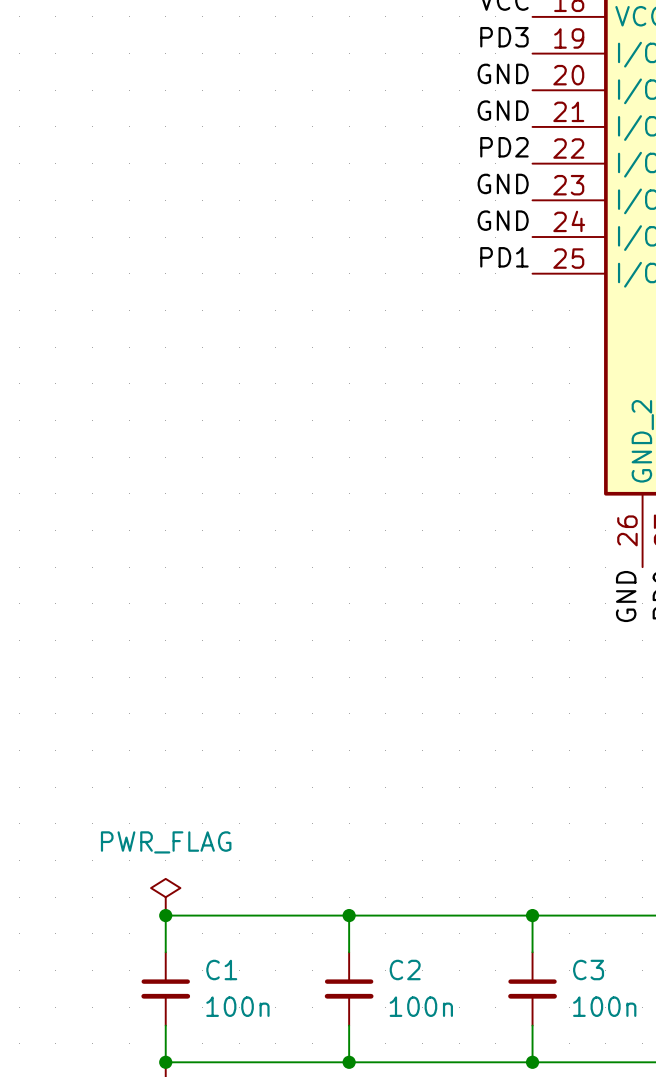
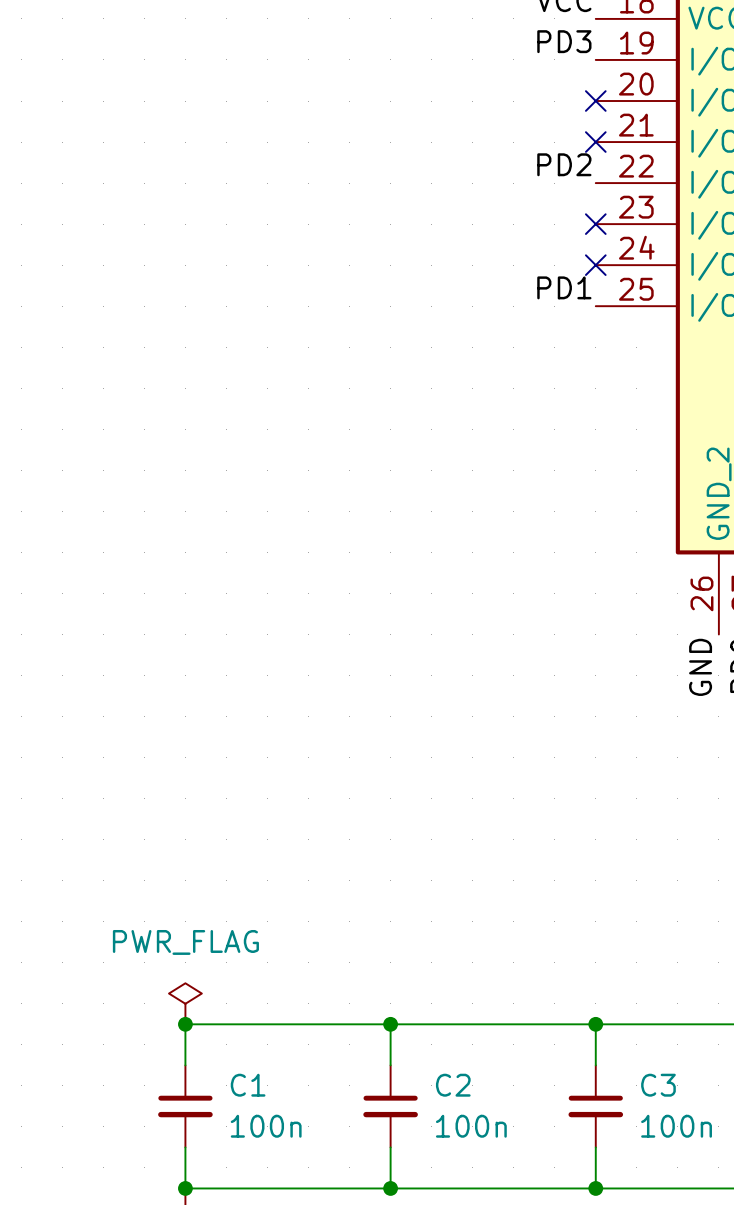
label: GND (503, 73) -> none
no-connect mark: none -> (595, 101)
label: GND (503, 110) -> none
no-connect mark: none -> (595, 142)
label: GND (503, 183) -> none
no-connect mark: none -> (595, 224)
label: GND (503, 220) -> none
no-connect mark: none -> (595, 265)

